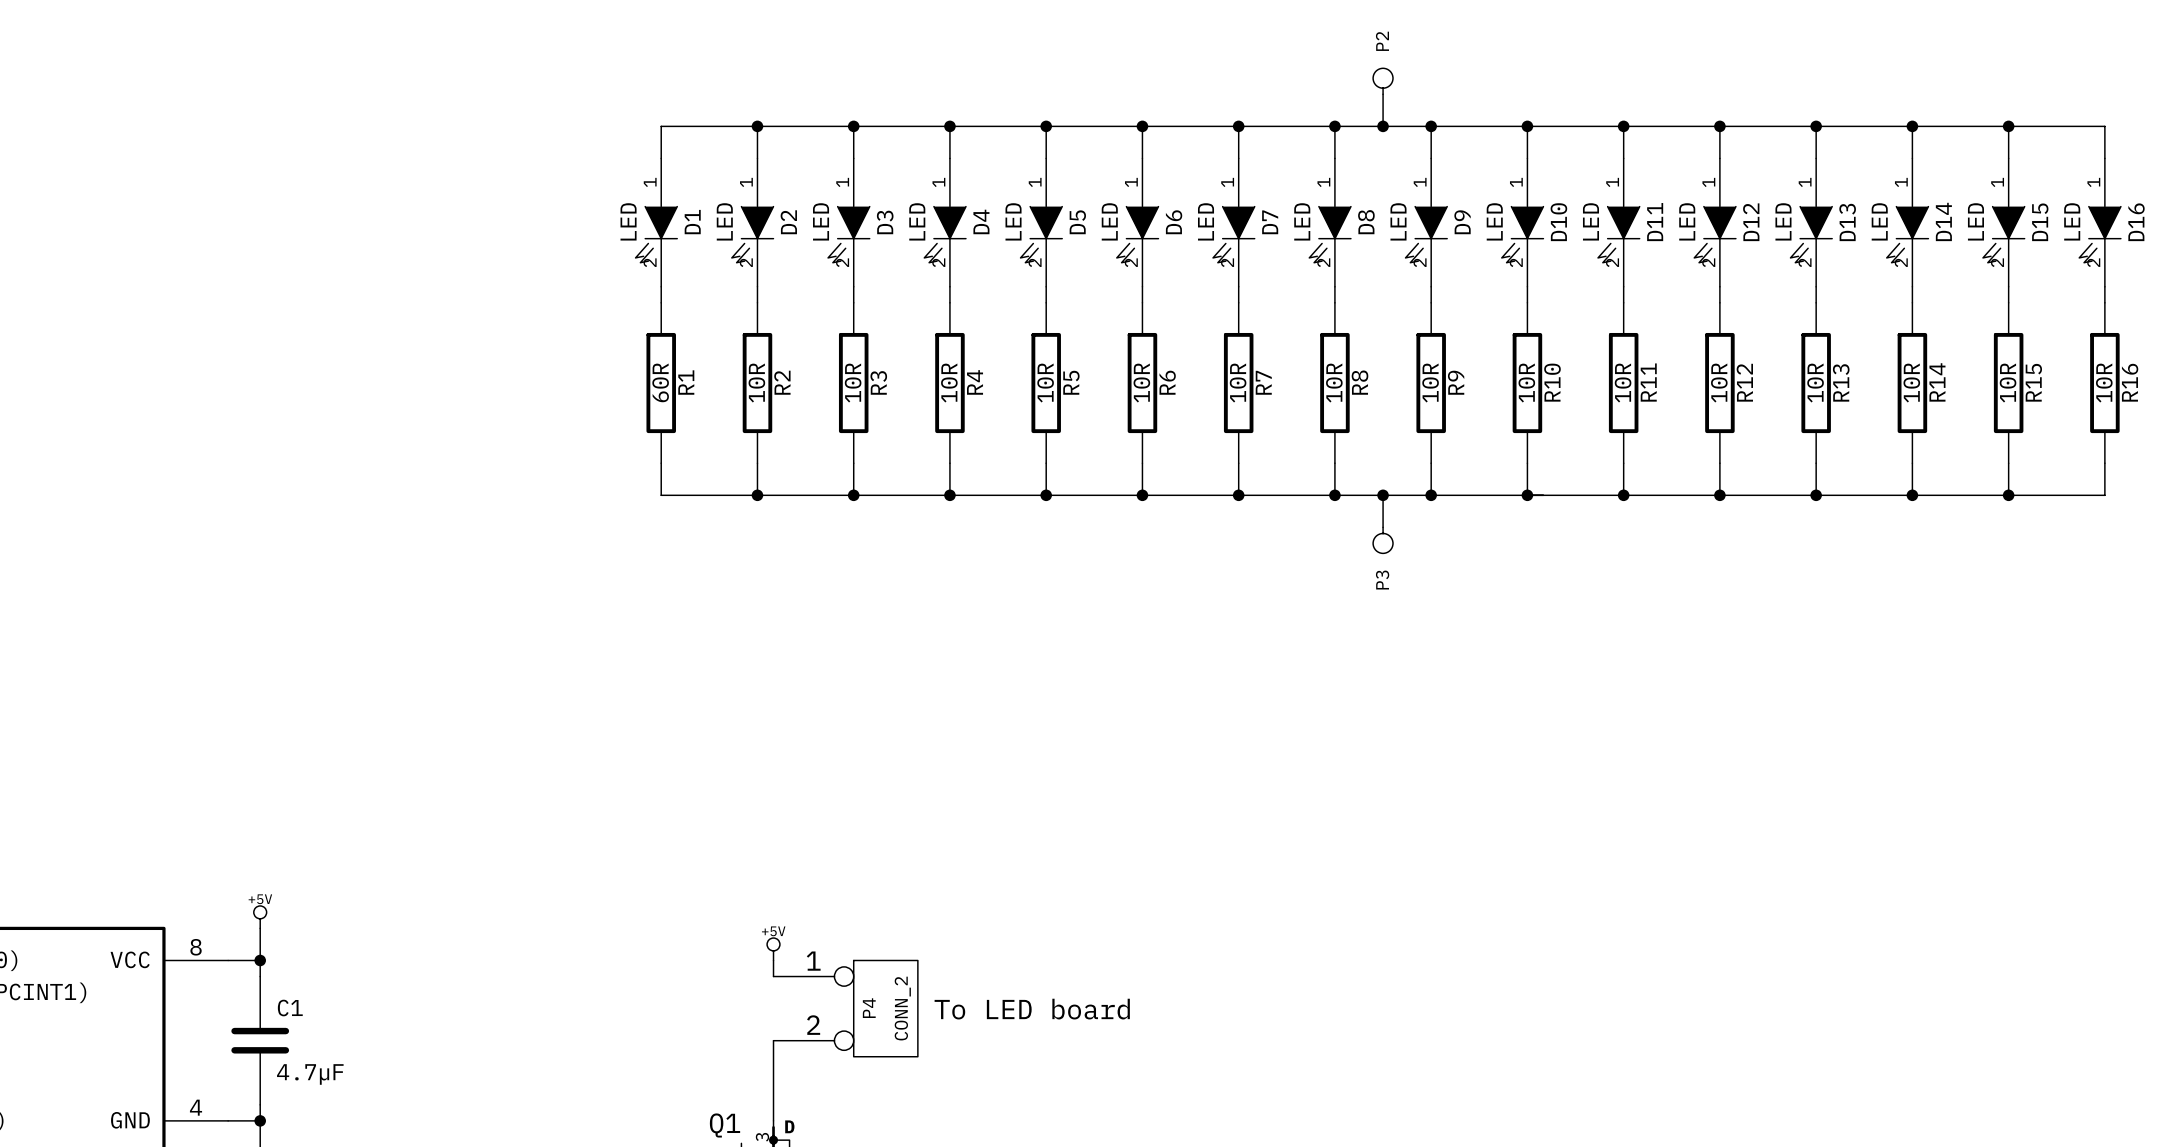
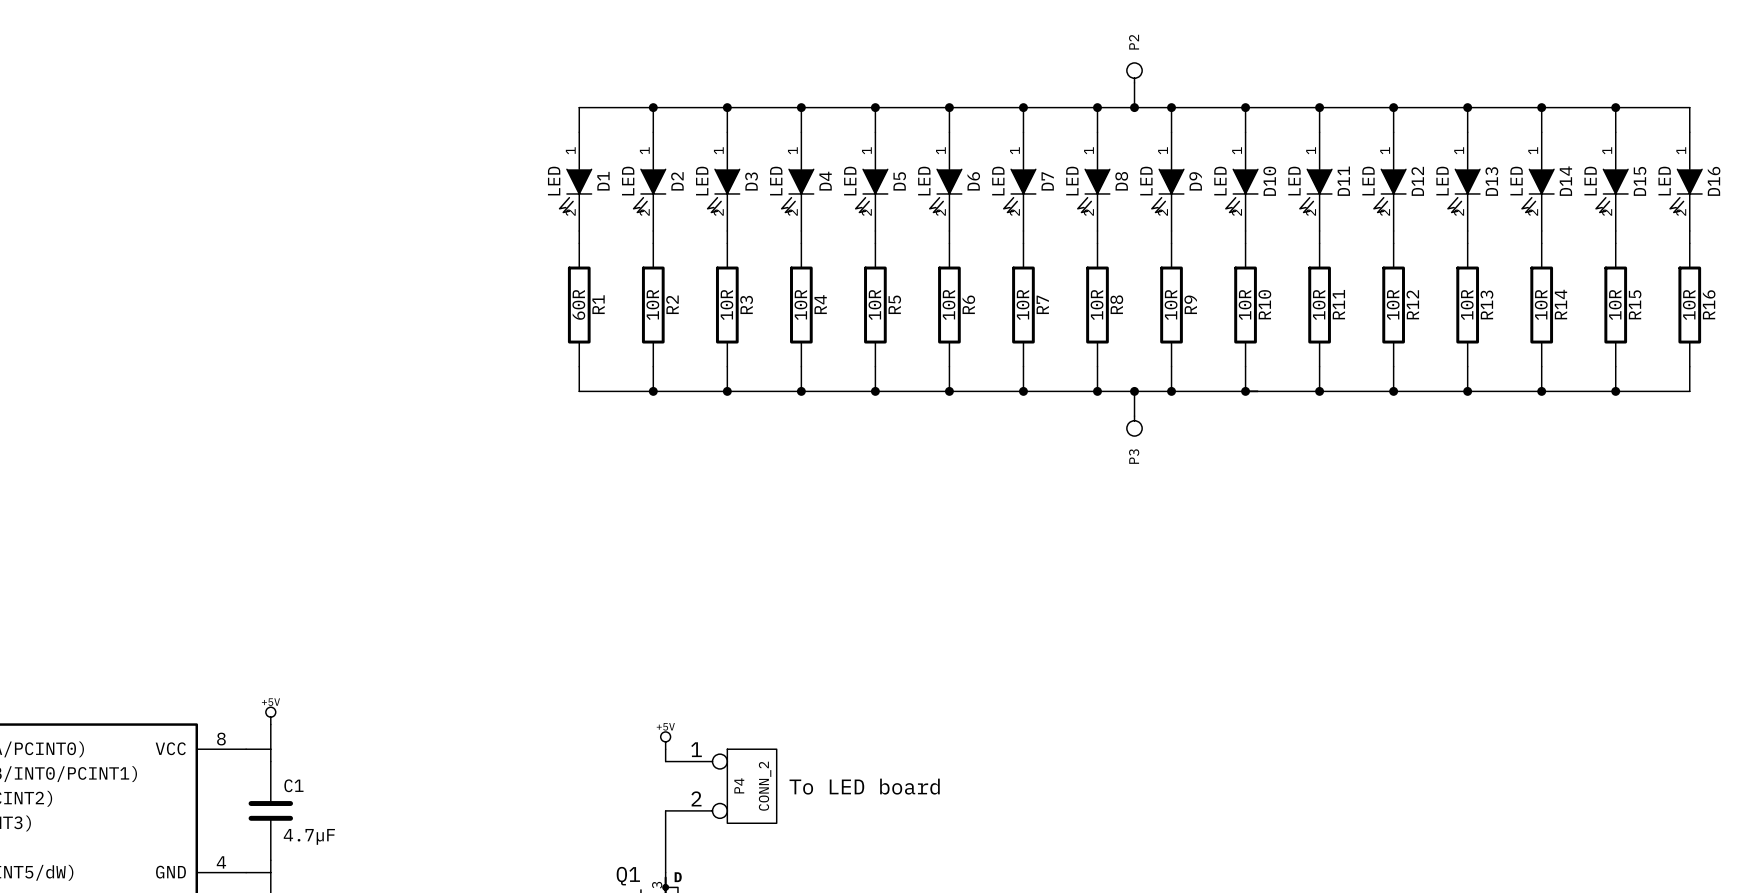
junction: (260, 960) -> none
junction: (260, 1120) -> none

